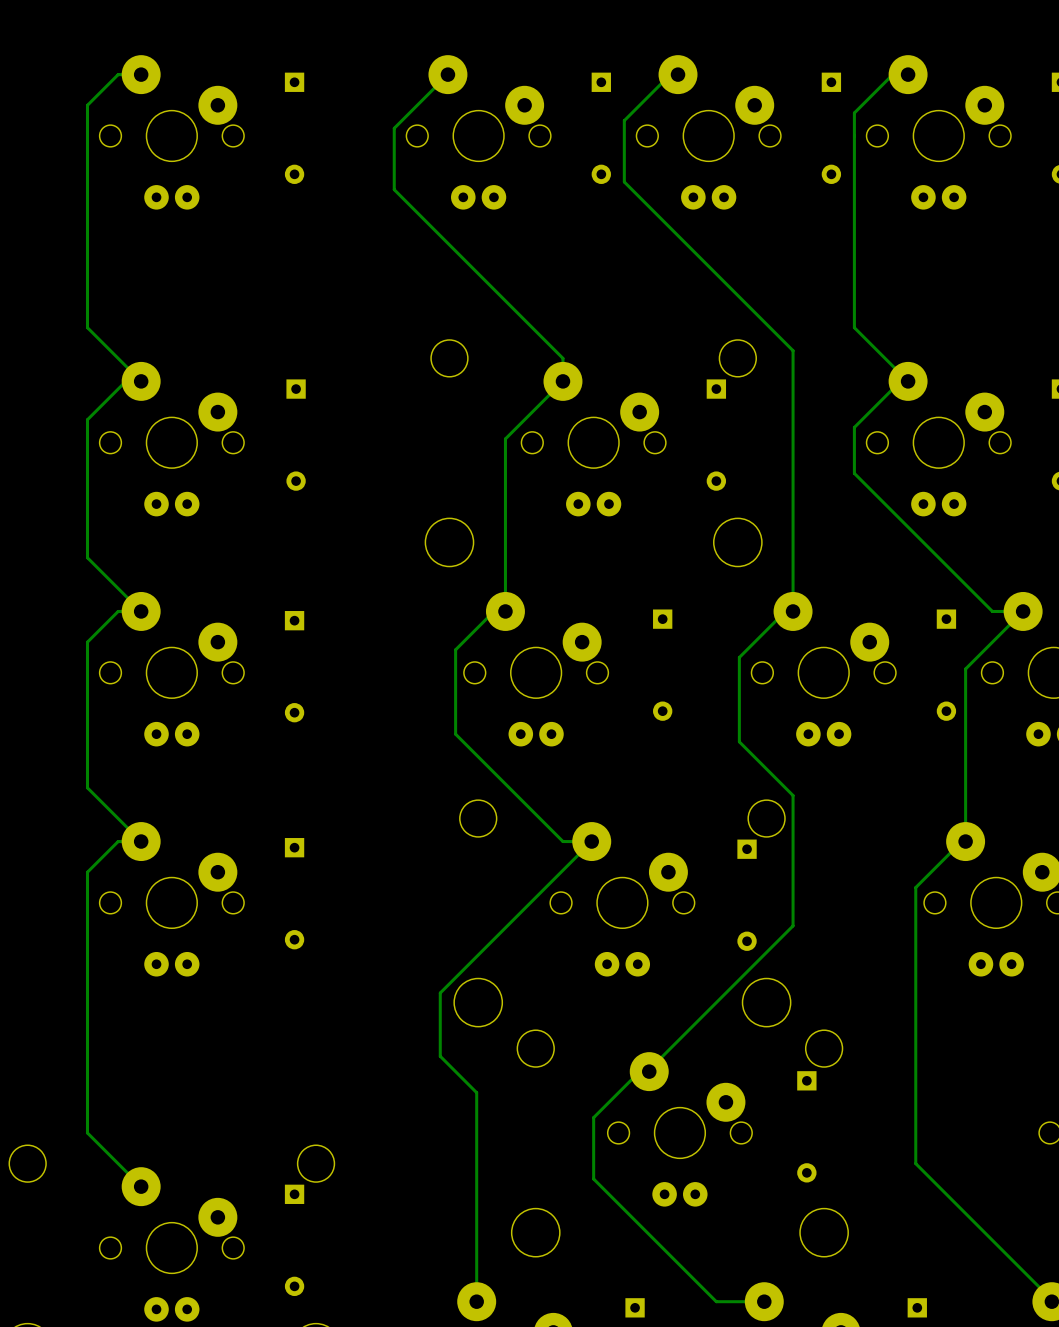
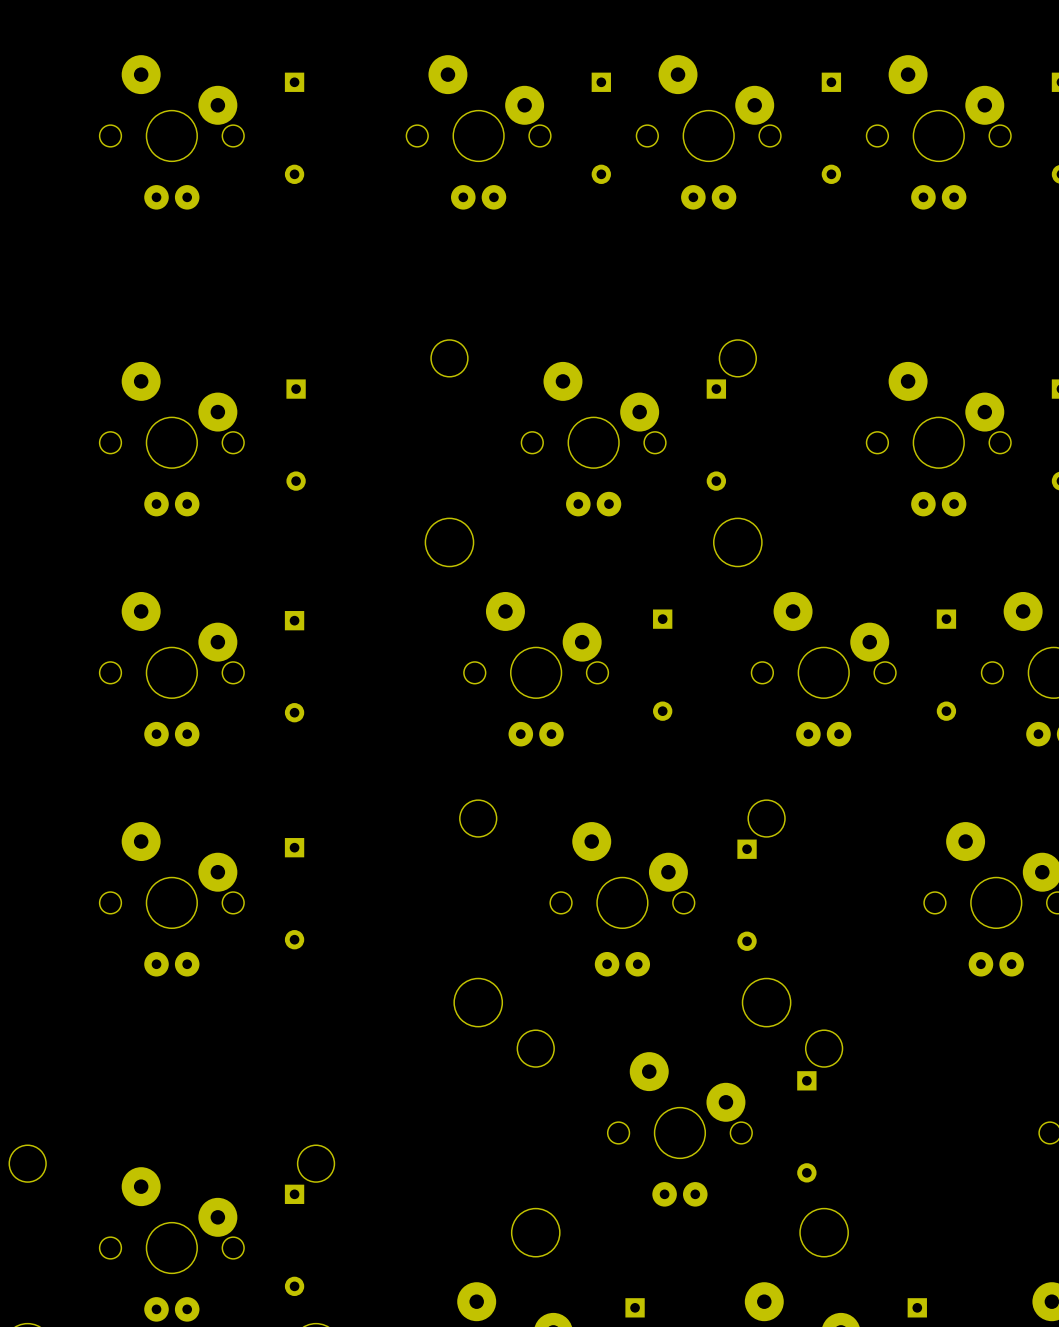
track: (141, 74) (118, 74) (87, 105) (87, 327) (141, 381) (125, 381) (87, 419) (87, 557) (141, 611) (118, 611) (87, 642) (87, 787) (141, 841) (118, 841) (87, 872) (87, 1132) (141, 1186) -> none
track: (447, 74) (394, 128) (394, 189) (562, 358) (562, 381) (505, 438) (505, 611) (493, 611) (455, 649) (455, 734) (562, 841) (591, 841) (440, 993) (440, 1056) (476, 1092) (476, 1301) -> none
track: (678, 74) (670, 74) (624, 120) (624, 181) (793, 350) (793, 611) (785, 611) (739, 657) (739, 741) (793, 795) (793, 925) (649, 1071) (639, 1071) (593, 1117) (593, 1178) (716, 1301) (764, 1301) -> none
track: (908, 74) (892, 74) (854, 112) (854, 327) (908, 381) (900, 381) (854, 427) (854, 473) (992, 611) (1023, 611) (965, 668) (965, 841) (961, 841) (915, 887) (915, 1163) (1051, 1301) -> none

